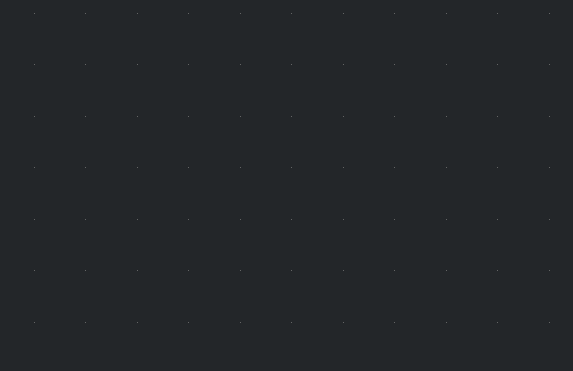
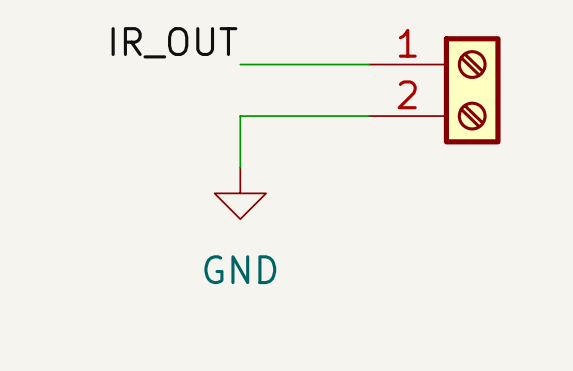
label: none -> IR_OUT (174, 42)
wire: none -> (240, 64) (369, 64)
part: none -> (434, 90)
wire: none -> (369, 116) (240, 116) (240, 167)
power symbol: none -> GND (240, 193)

